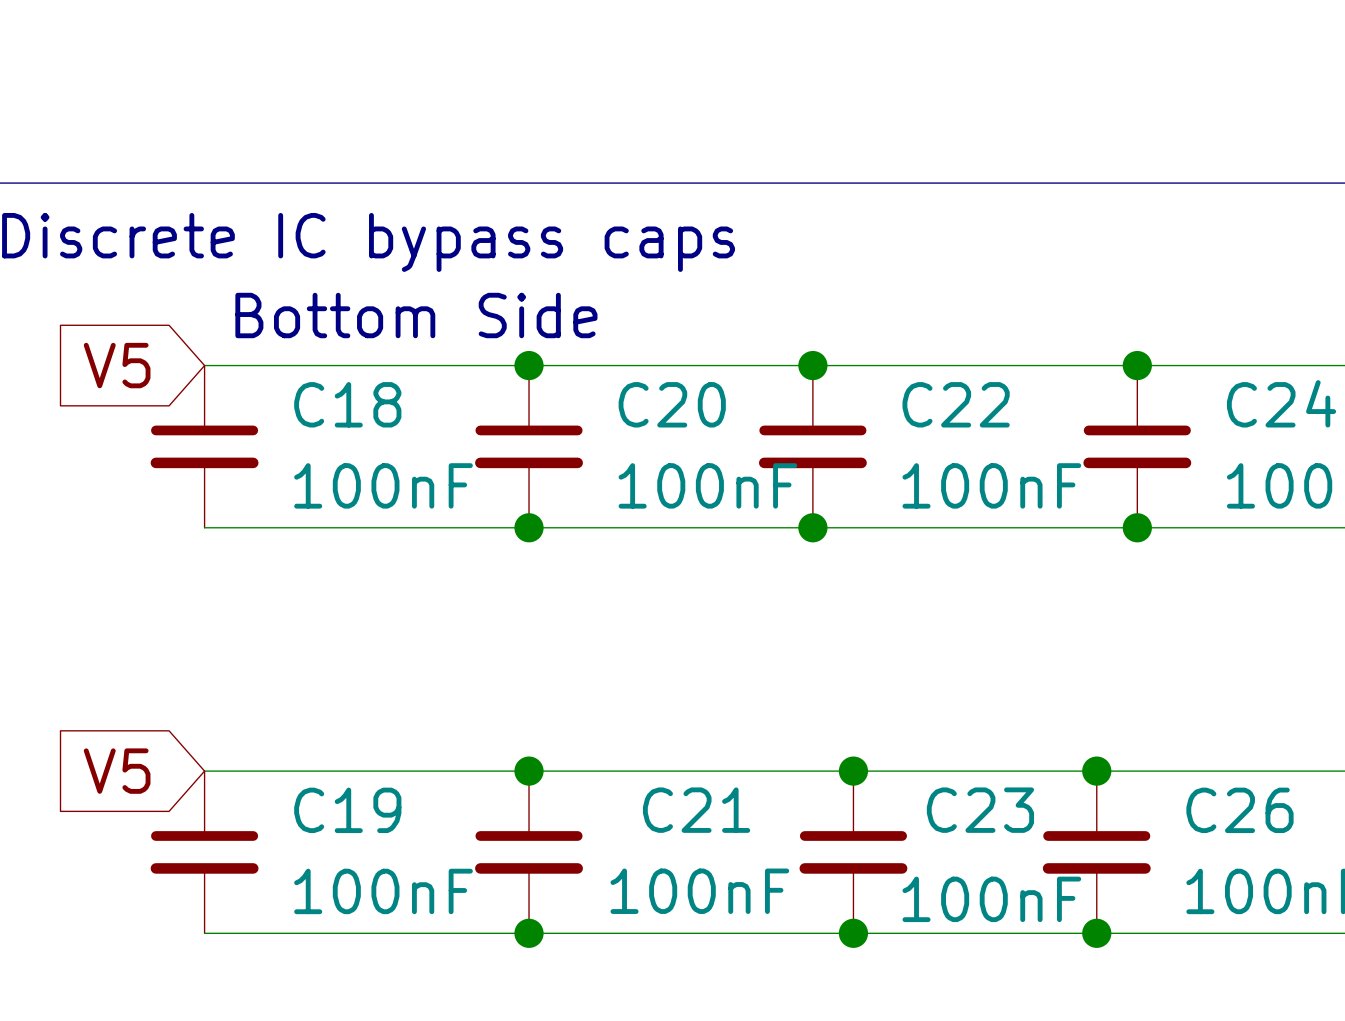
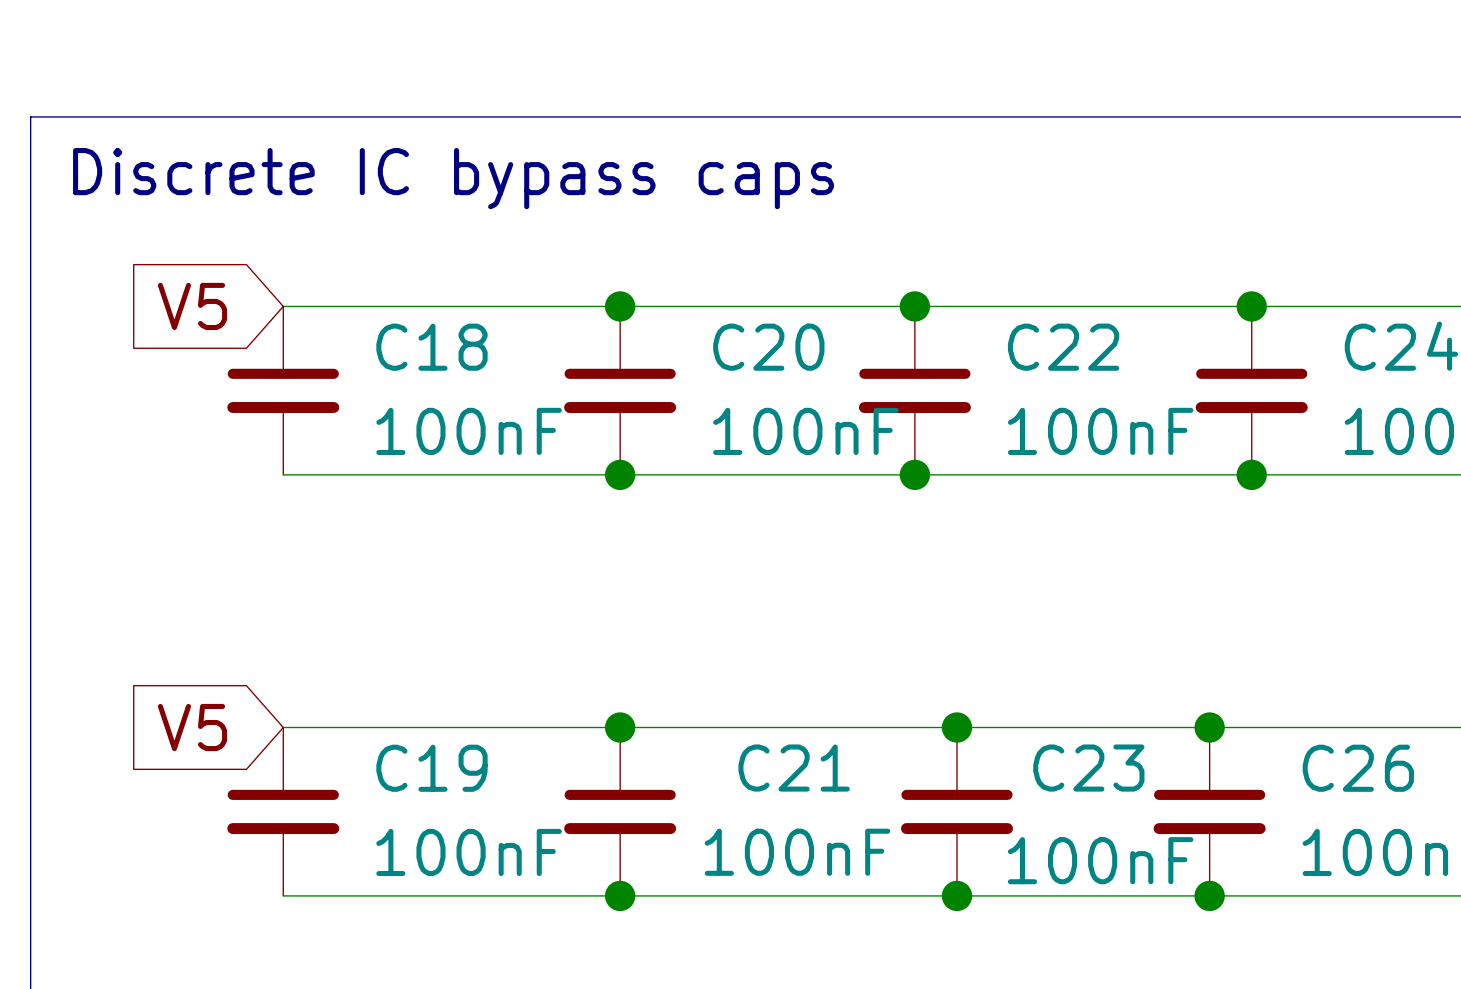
text: Bottom Side (416, 315) -> none

